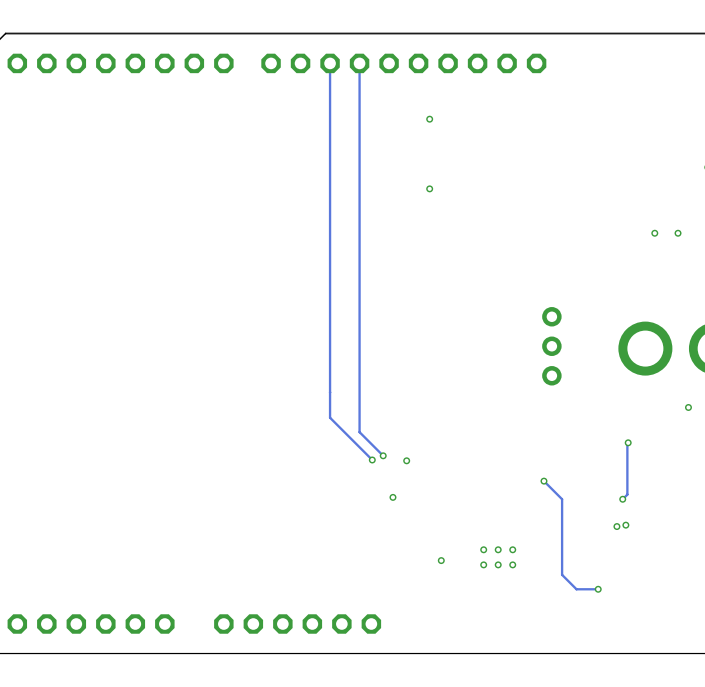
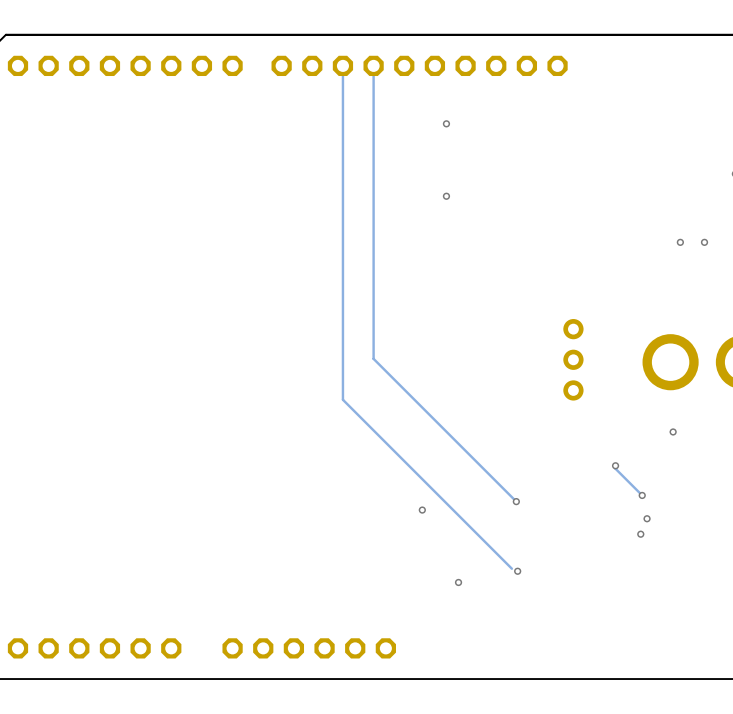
track: (359, 345) (359, 432) (383, 455) -> (373, 358) (516, 501)
track: (330, 384) (330, 417) (372, 459) -> (342, 399) (511, 568)
via: (688, 407) -> none
via: none -> (673, 431)
track: (628, 442) (627, 494) (622, 499) -> none
via: (628, 442) -> none
track: none -> (615, 465) (615, 468) (642, 495)
via: none -> (615, 465)
via: (383, 455) -> none
via: (372, 459) -> none
via: (406, 460) -> none
via: none -> (642, 495)
track: (543, 481) (562, 499) (562, 574) (576, 589) (598, 589) -> none
via: (543, 481) -> none
via: none -> (516, 501)
via: none -> (422, 510)
via: (392, 497) -> none
via: none -> (640, 534)
via: (625, 525) -> none
via: (616, 526) -> none
via: (483, 549) -> none
via: (512, 549) -> none
via: (483, 564) -> none
via: (498, 564) -> none
via: (512, 564) -> none
via: (598, 589) -> none

